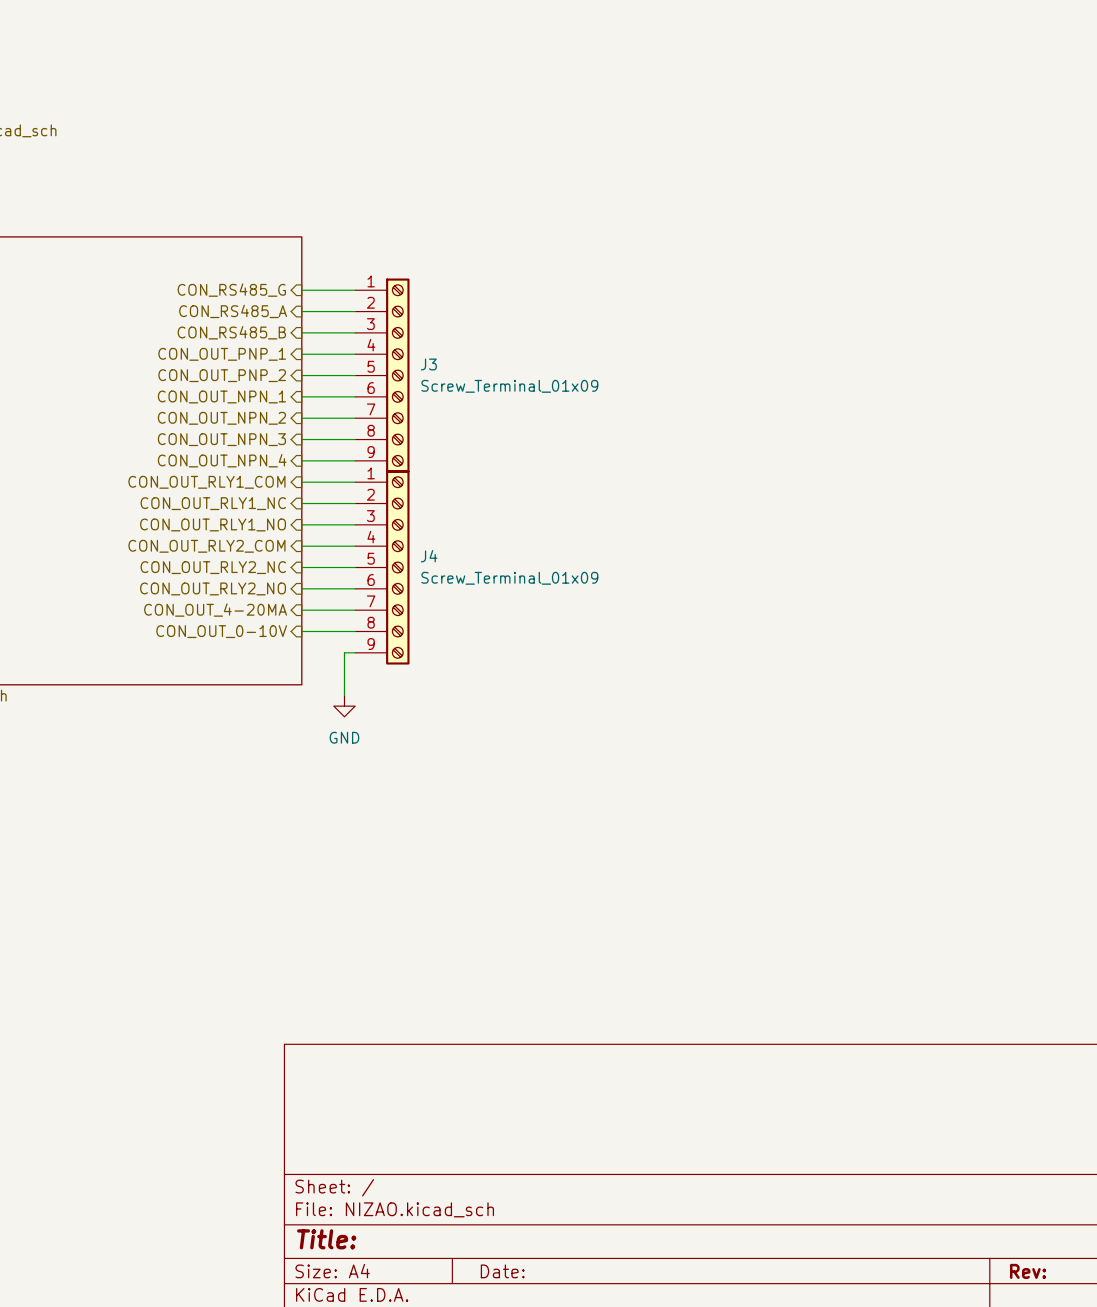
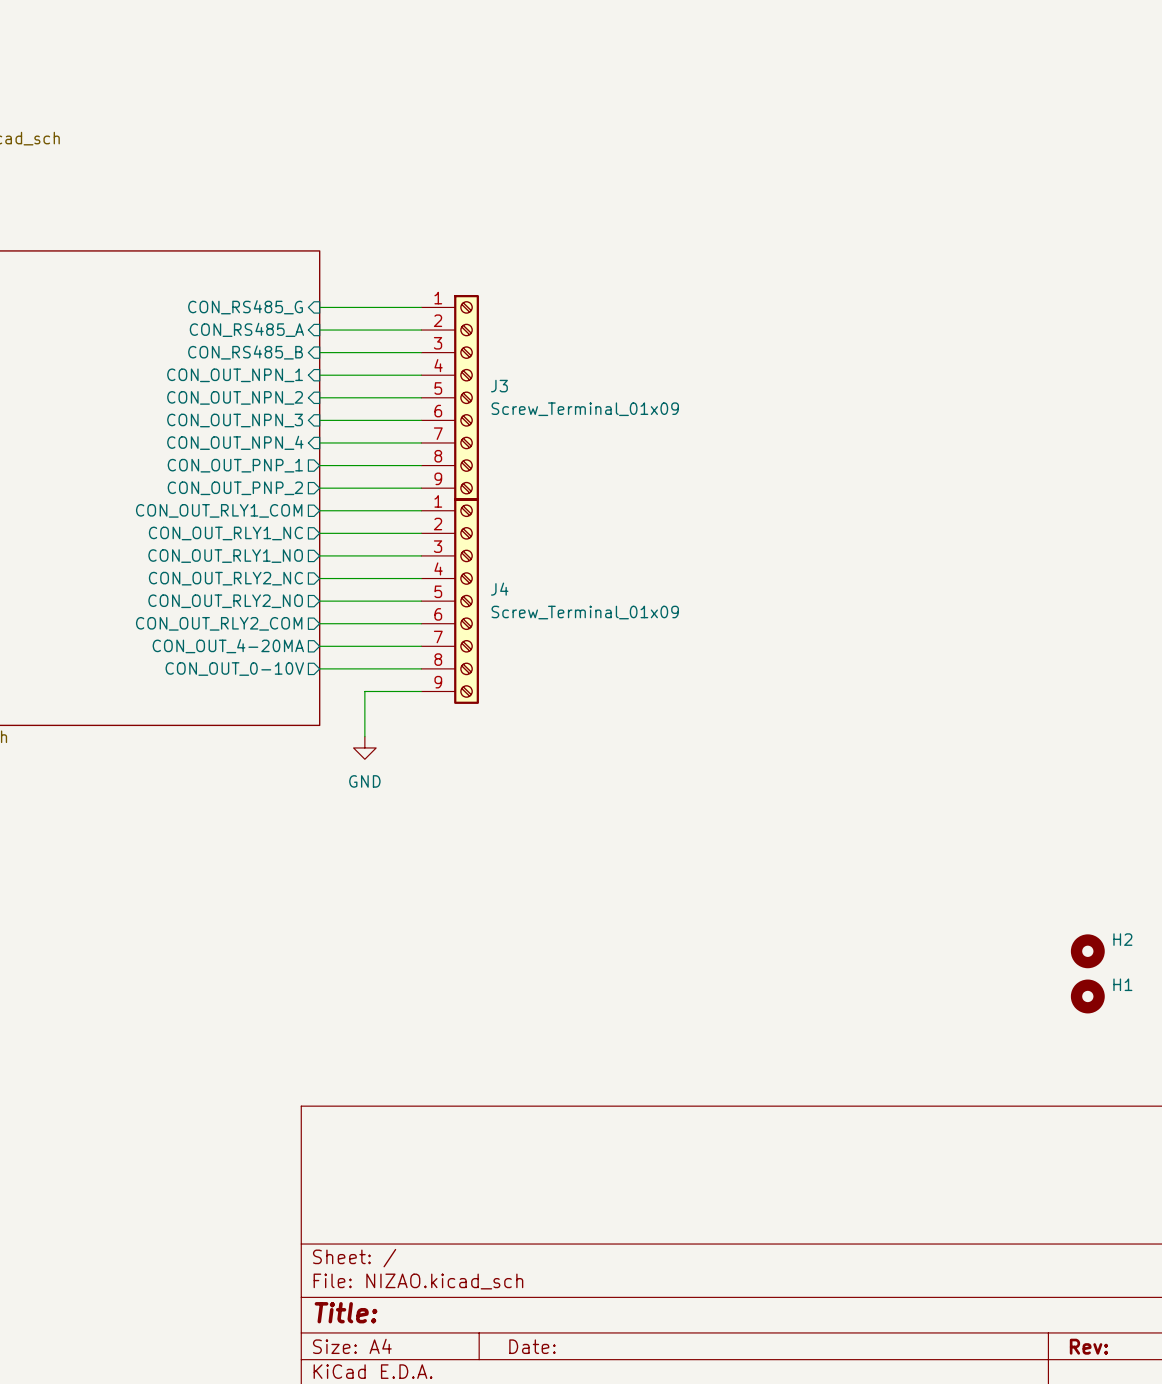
hierarchical label: CON_RS485_G (231, 290) -> none
sheet pin: none -> CON_RS485_G (245, 307)
hierarchical label: CON_RS485_A (233, 311) -> none
sheet pin: none -> CON_RS485_A (246, 329)
hierarchical label: CON_RS485_B (231, 332) -> none
sheet pin: none -> CON_RS485_B (245, 352)
sheet pin: none -> CON_OUT_NPN_1 (235, 375)
hierarchical label: CON_OUT_PNP_1 (222, 354) -> none
sheet pin: none -> CON_OUT_NPN_2 (235, 397)
hierarchical label: CON_OUT_PNP_2 (222, 375) -> none
J3 position: (382, 375) -> (450, 397)
hierarchical label: CON_OUT_NPN_1 (221, 396) -> none
sheet pin: none -> CON_OUT_NPN_3 (235, 420)
hierarchical label: CON_OUT_NPN_2 (221, 418) -> none
sheet pin: none -> CON_OUT_NPN_4 (235, 442)
hierarchical label: CON_OUT_NPN_3 (221, 439) -> none
sheet pin: none -> CON_OUT_PNP_1 (235, 465)
hierarchical label: CON_OUT_NPN_4 (222, 460) -> none
sheet pin: none -> CON_OUT_PNP_2 (235, 488)
hierarchical label: CON_OUT_RLY1_COM (206, 482) -> none
sheet pin: none -> CON_OUT_RLY1_COM (219, 510)
hierarchical label: CON_OUT_RLY1_NC (213, 503) -> none
sheet pin: none -> CON_OUT_RLY1_NC (225, 533)
hierarchical label: CON_OUT_RLY1_NO (213, 524) -> none
sheet pin: none -> CON_OUT_RLY1_NO (225, 556)
hierarchical label: CON_OUT_RLY2_COM (206, 546) -> none
sheet pin: none -> CON_OUT_RLY2_NC (225, 578)
hierarchical label: CON_OUT_RLY2_NC (213, 567) -> none
sheet pin: none -> CON_OUT_RLY2_NO (225, 601)
J4 position: (382, 567) -> (450, 601)
sheet pin: none -> CON_OUT_RLY2_COM (219, 623)
hierarchical label: CON_OUT_RLY2_NO (213, 588) -> none
hierarchical label: CON_OUT_4-20MA (215, 610) -> none
sheet pin: none -> CON_OUT_4-20MA (228, 646)
hierarchical label: CON_OUT_0-10V (221, 631) -> none
sheet pin: none -> CON_OUT_0-10V (234, 669)
H2: none -> (1087, 951)
H1: none -> (1087, 996)

